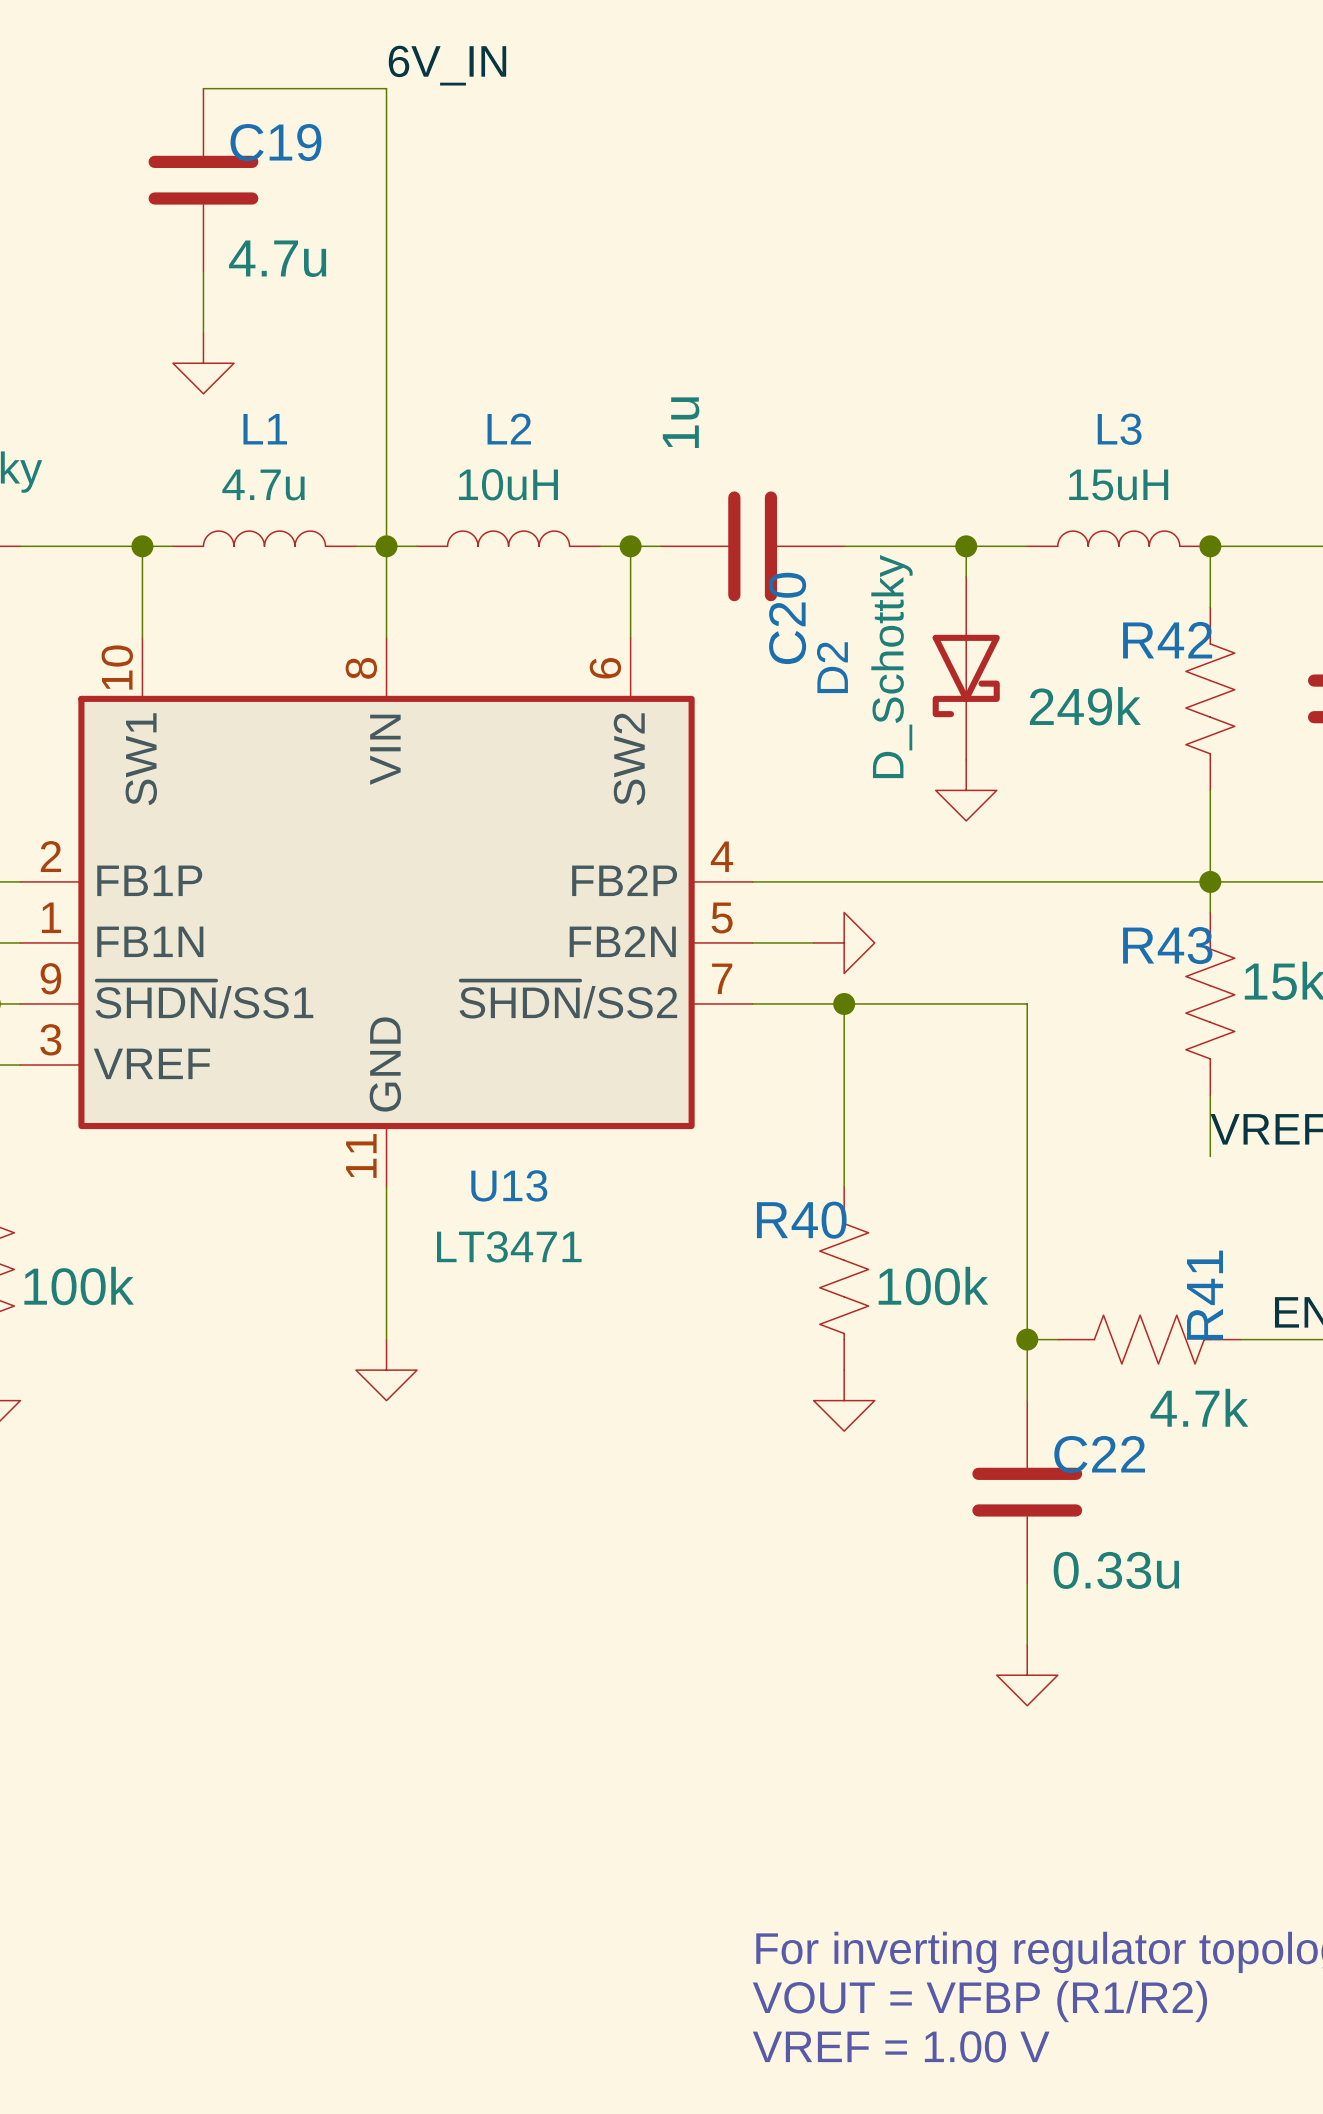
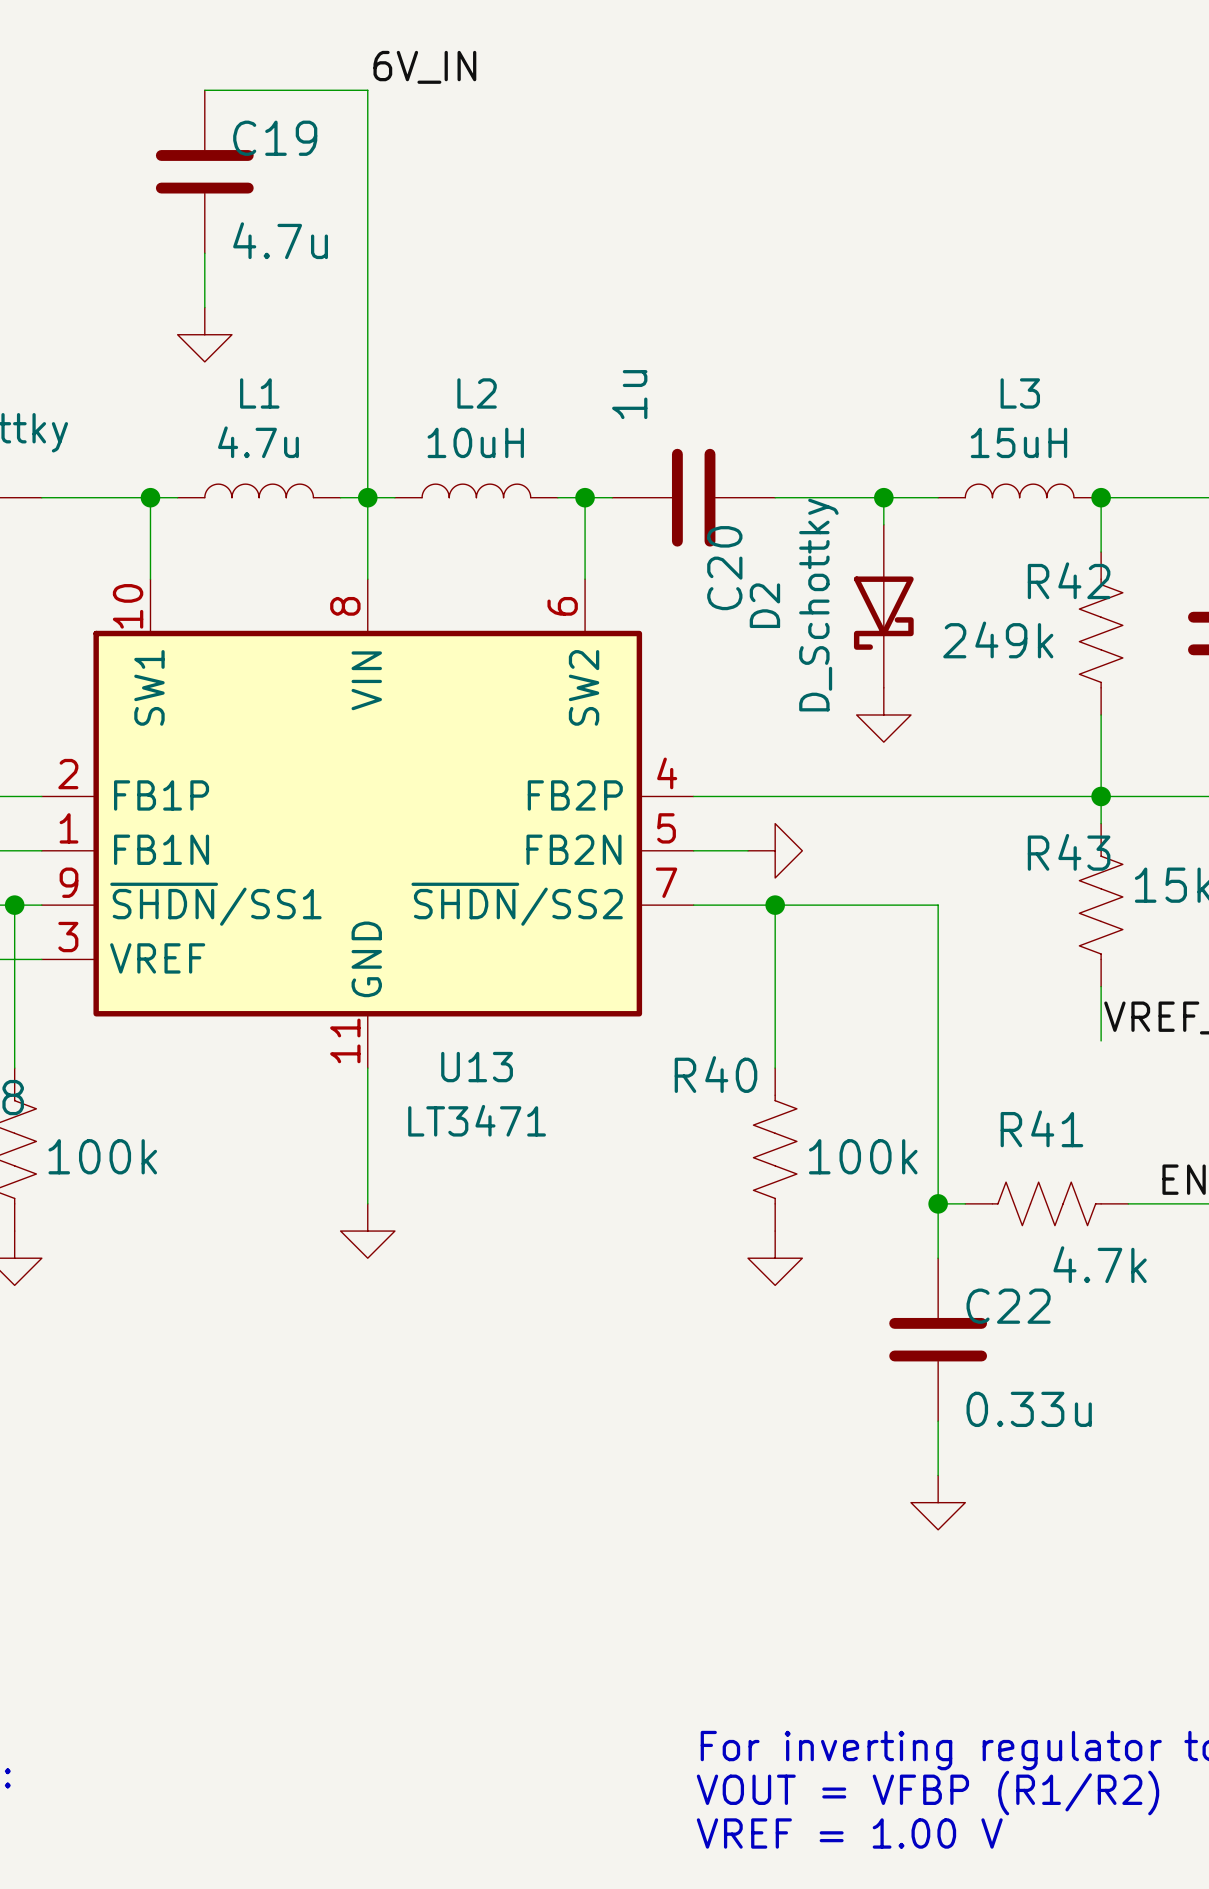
R40 name position: R40 (801, 1220) -> R40 (715, 1074)
R41 name rotation: 0° (1205, 1295) -> 90° clockwise (1041, 1128)

